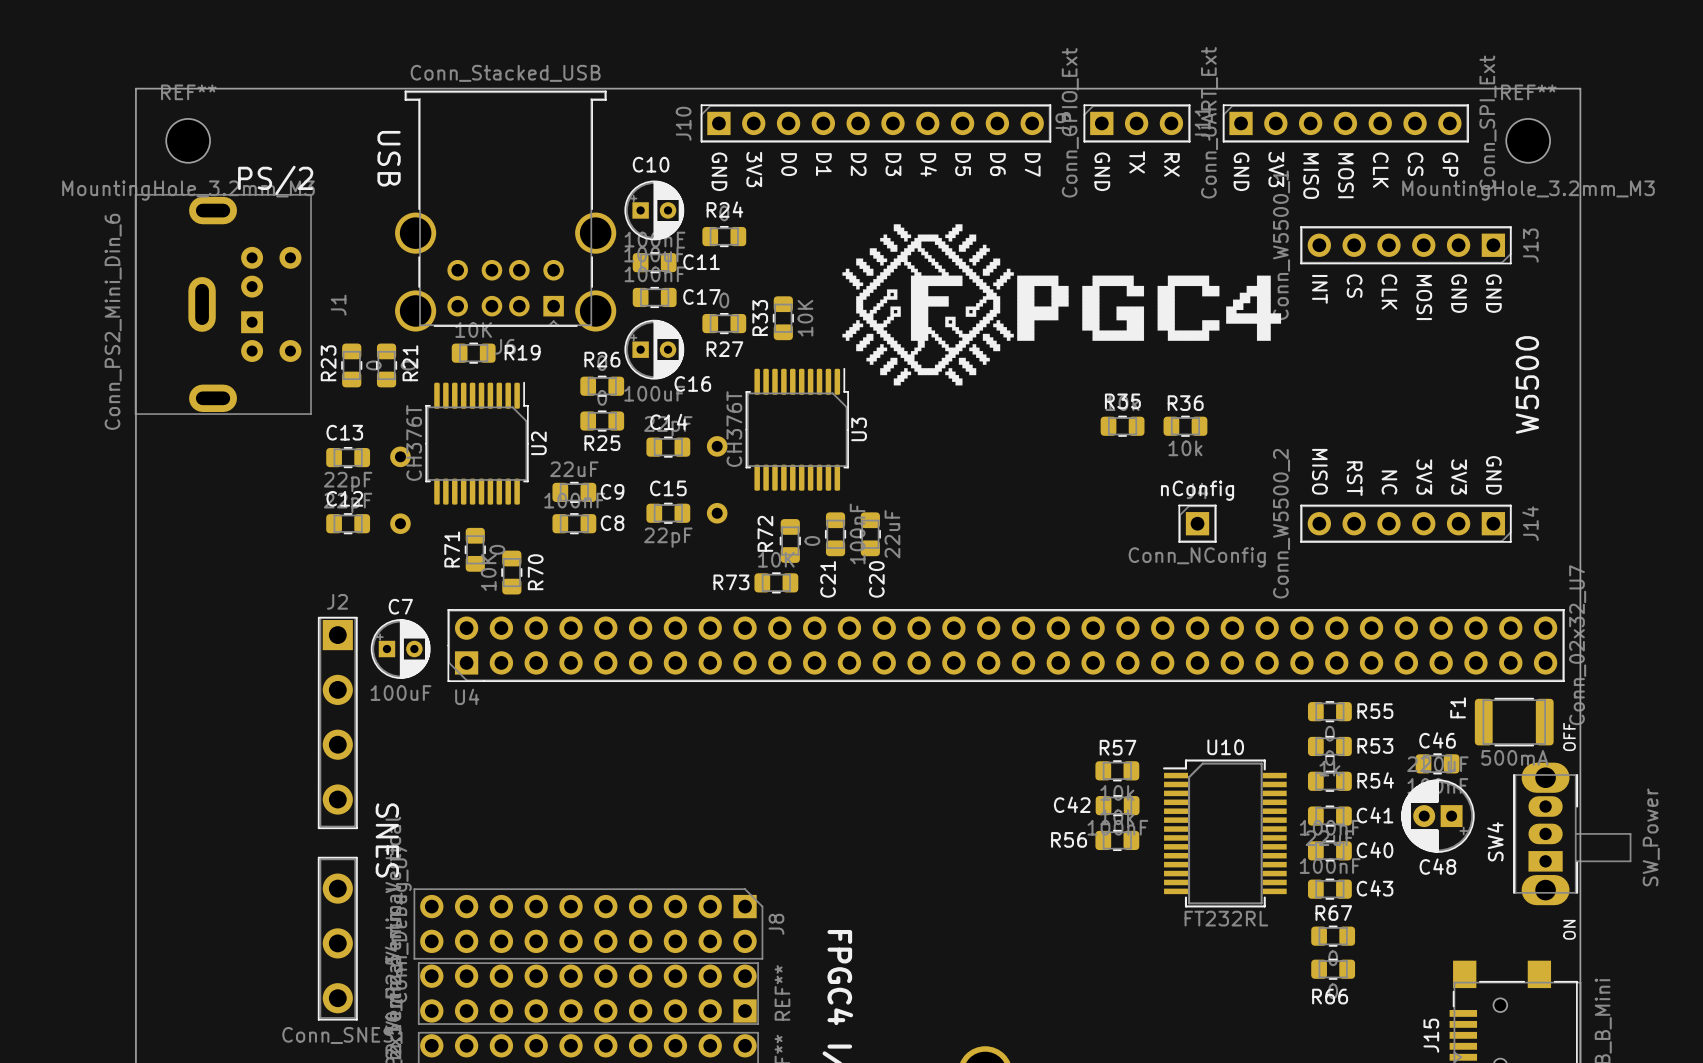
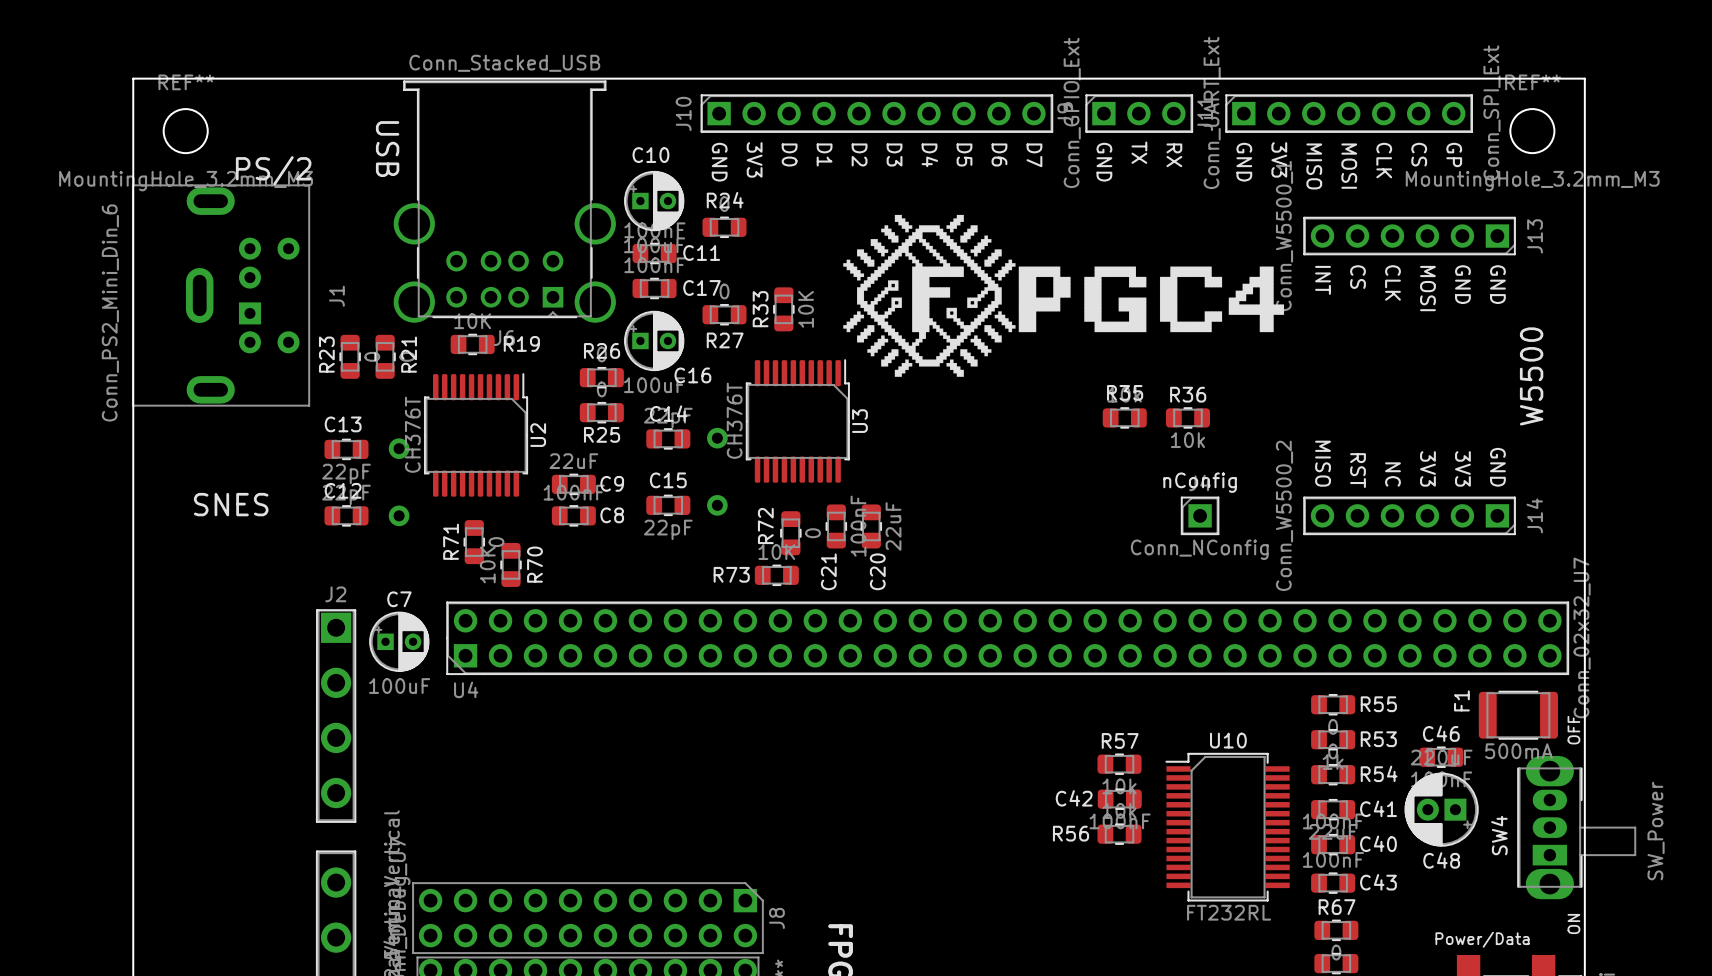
text: none -> SNES (231, 504)
text: SNES (387, 840) -> none
text: none -> Power/Data (1482, 939)

